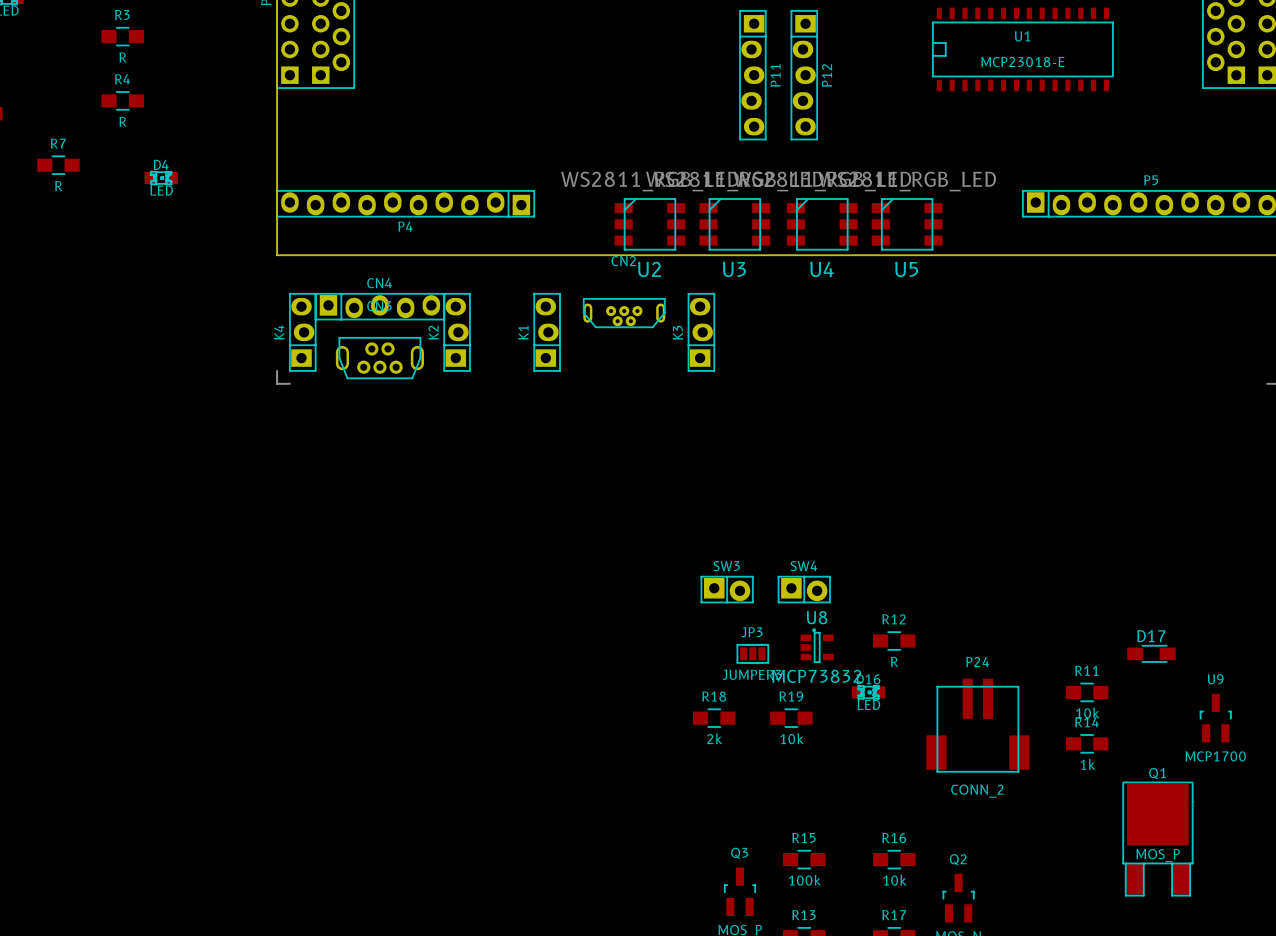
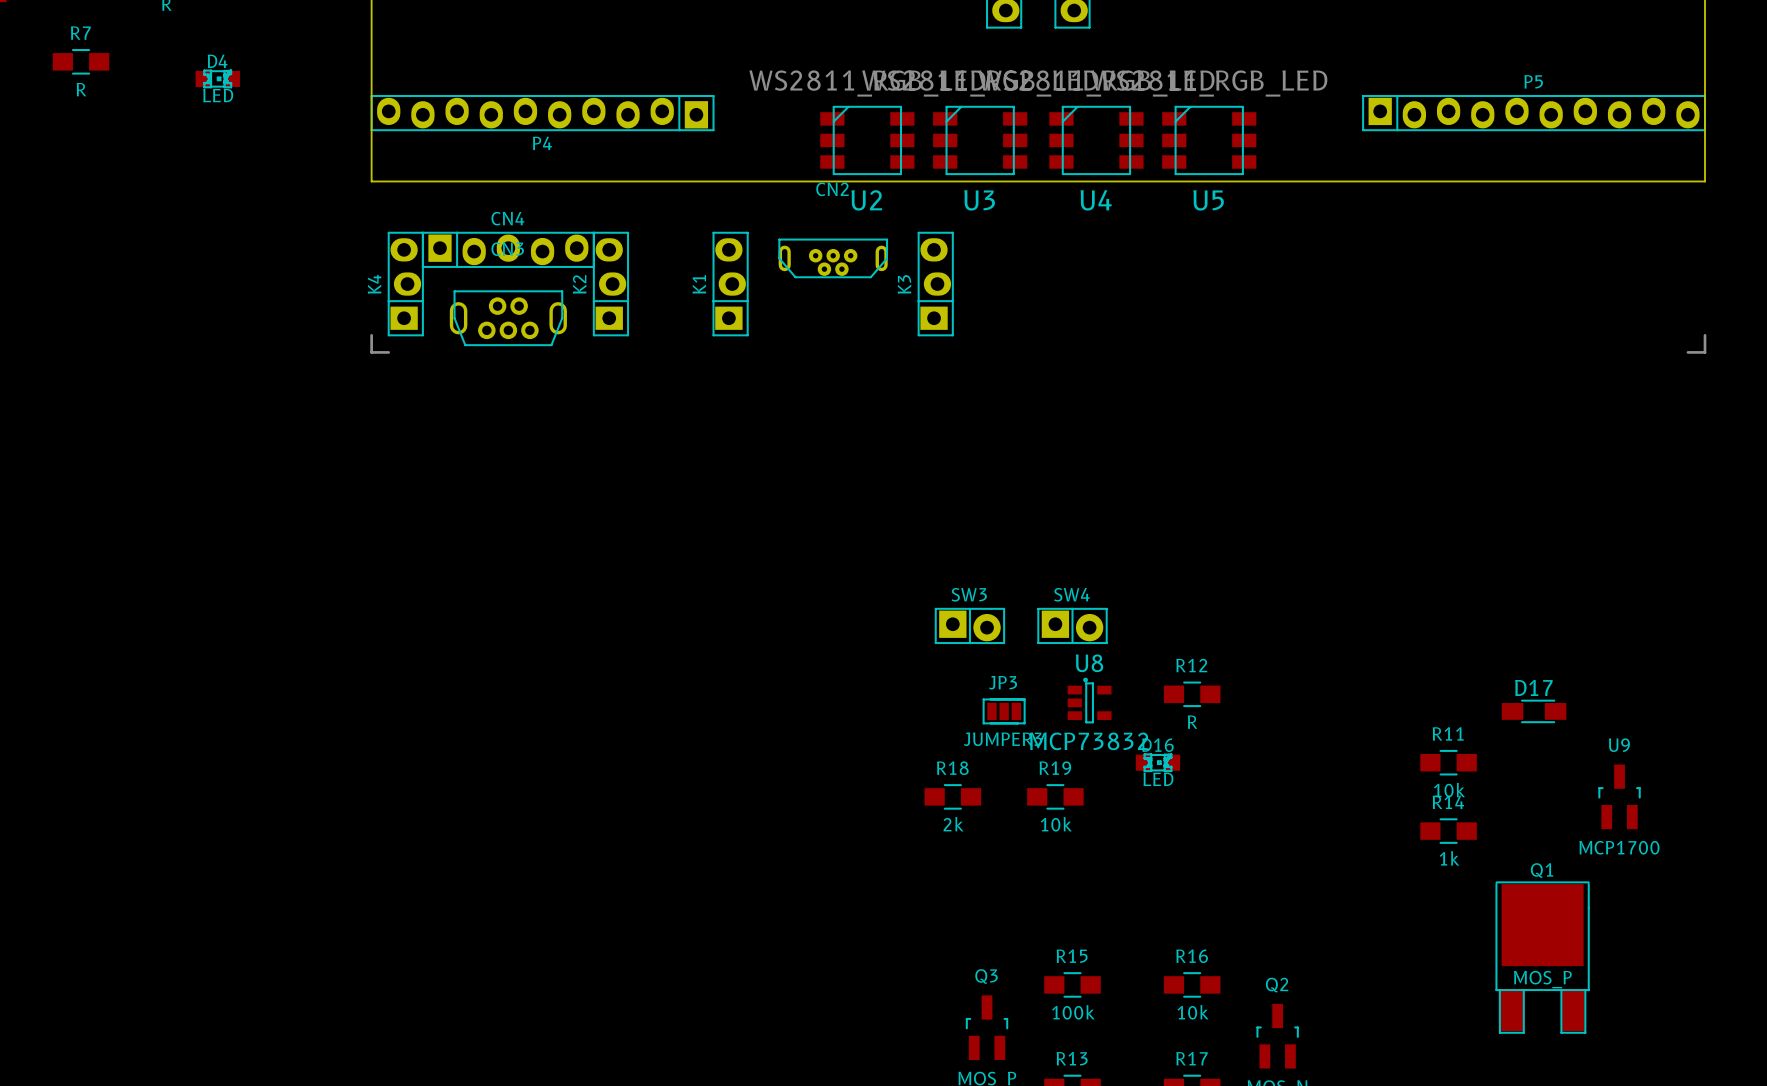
P24: CONN_2 (977, 725) -> none

